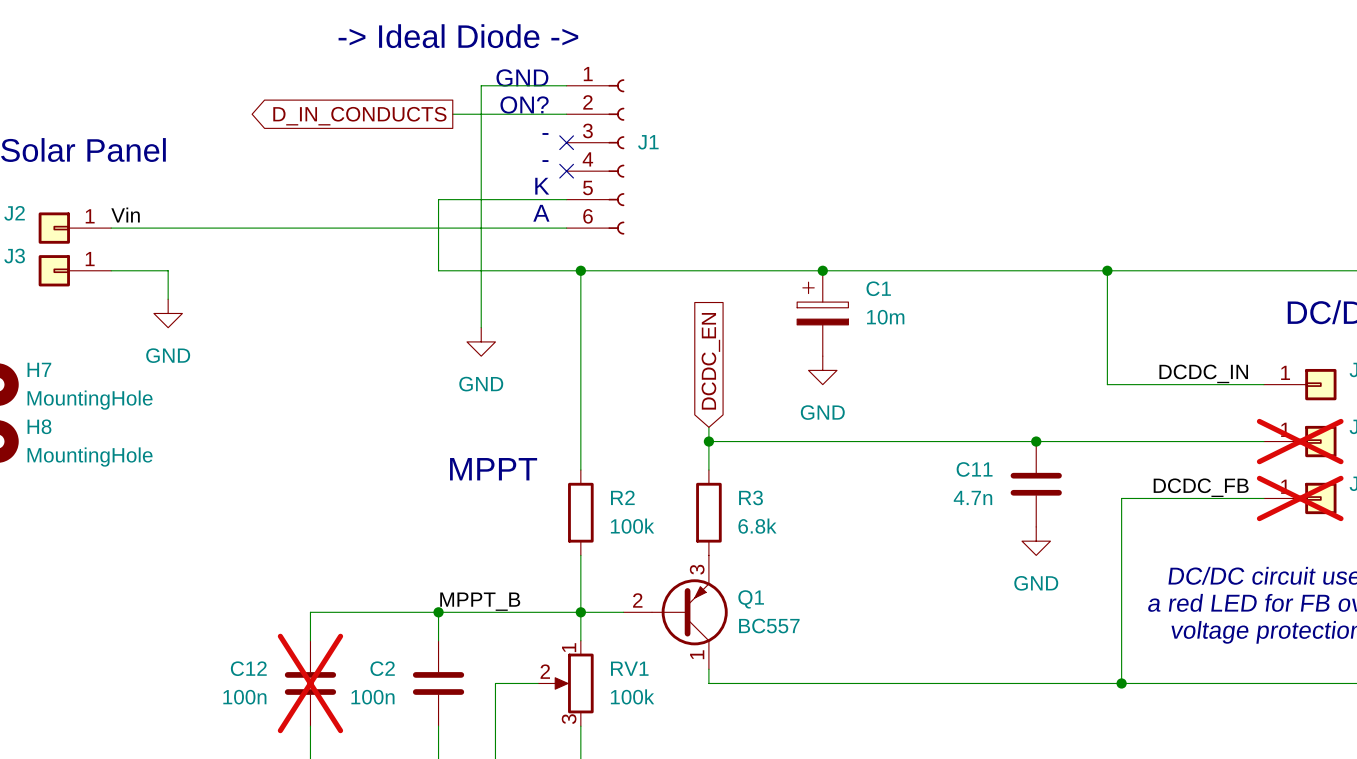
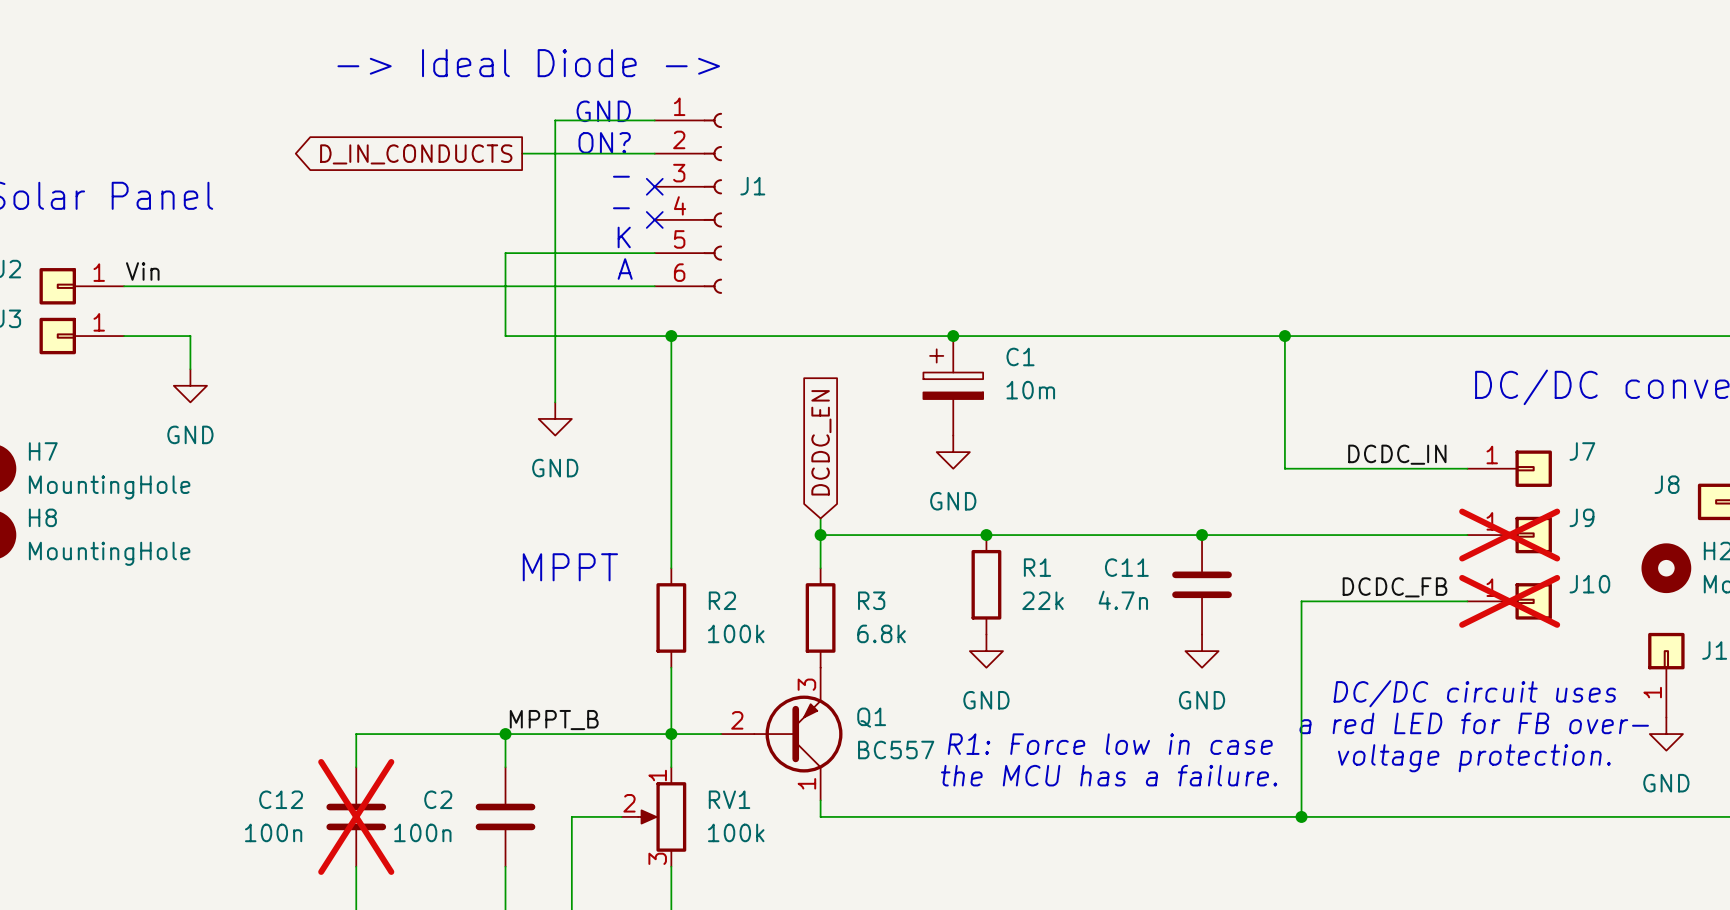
junction: none -> (986, 535)
R1: none -> 22k (986, 584)
power symbol: none -> GND (986, 651)
text: none -> R1: Force low in case (1110, 744)
text: none -> the MCU has a failure. (1109, 775)

